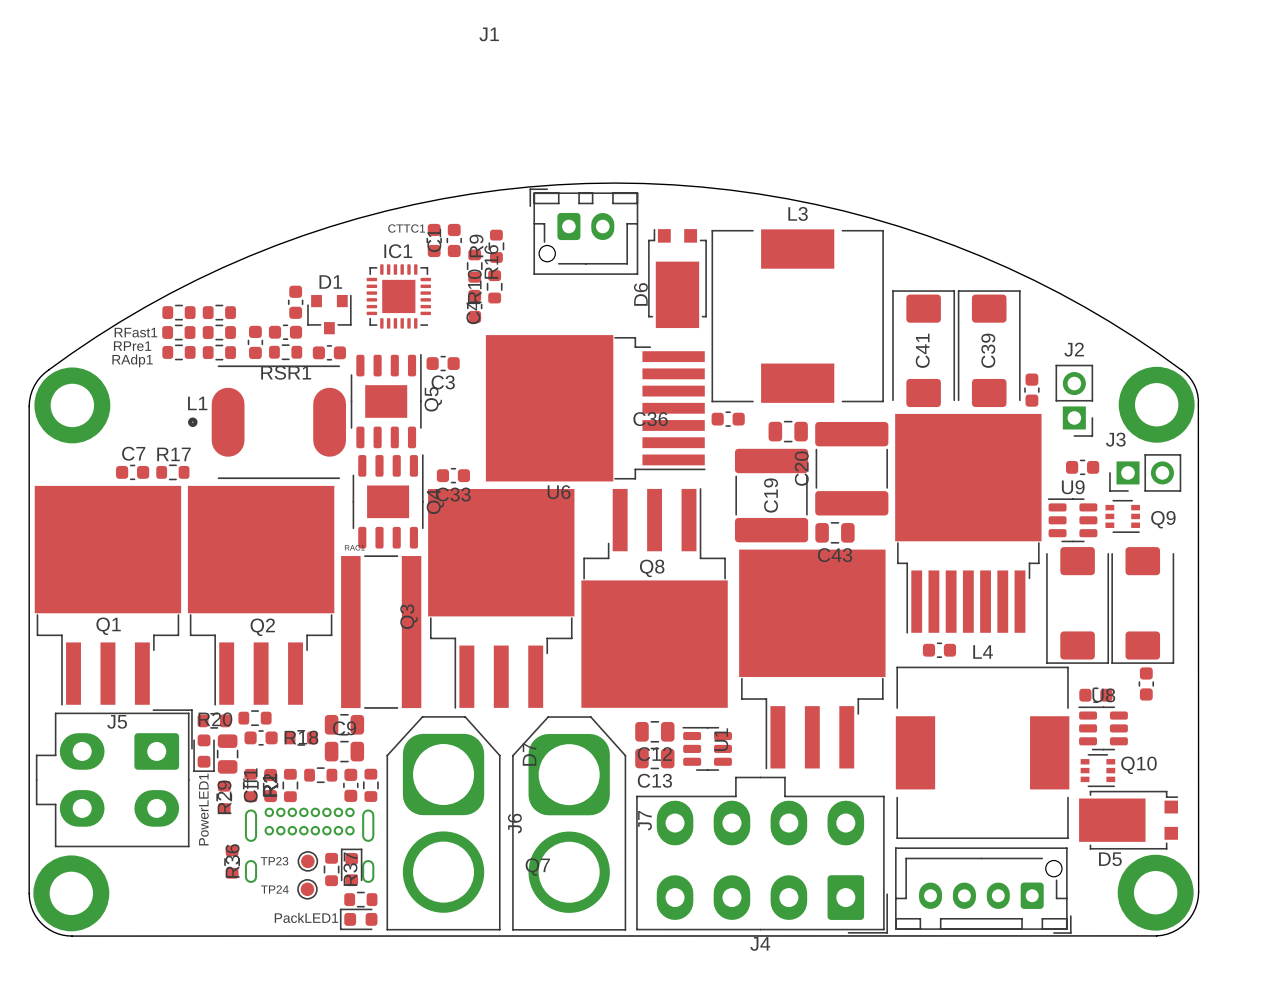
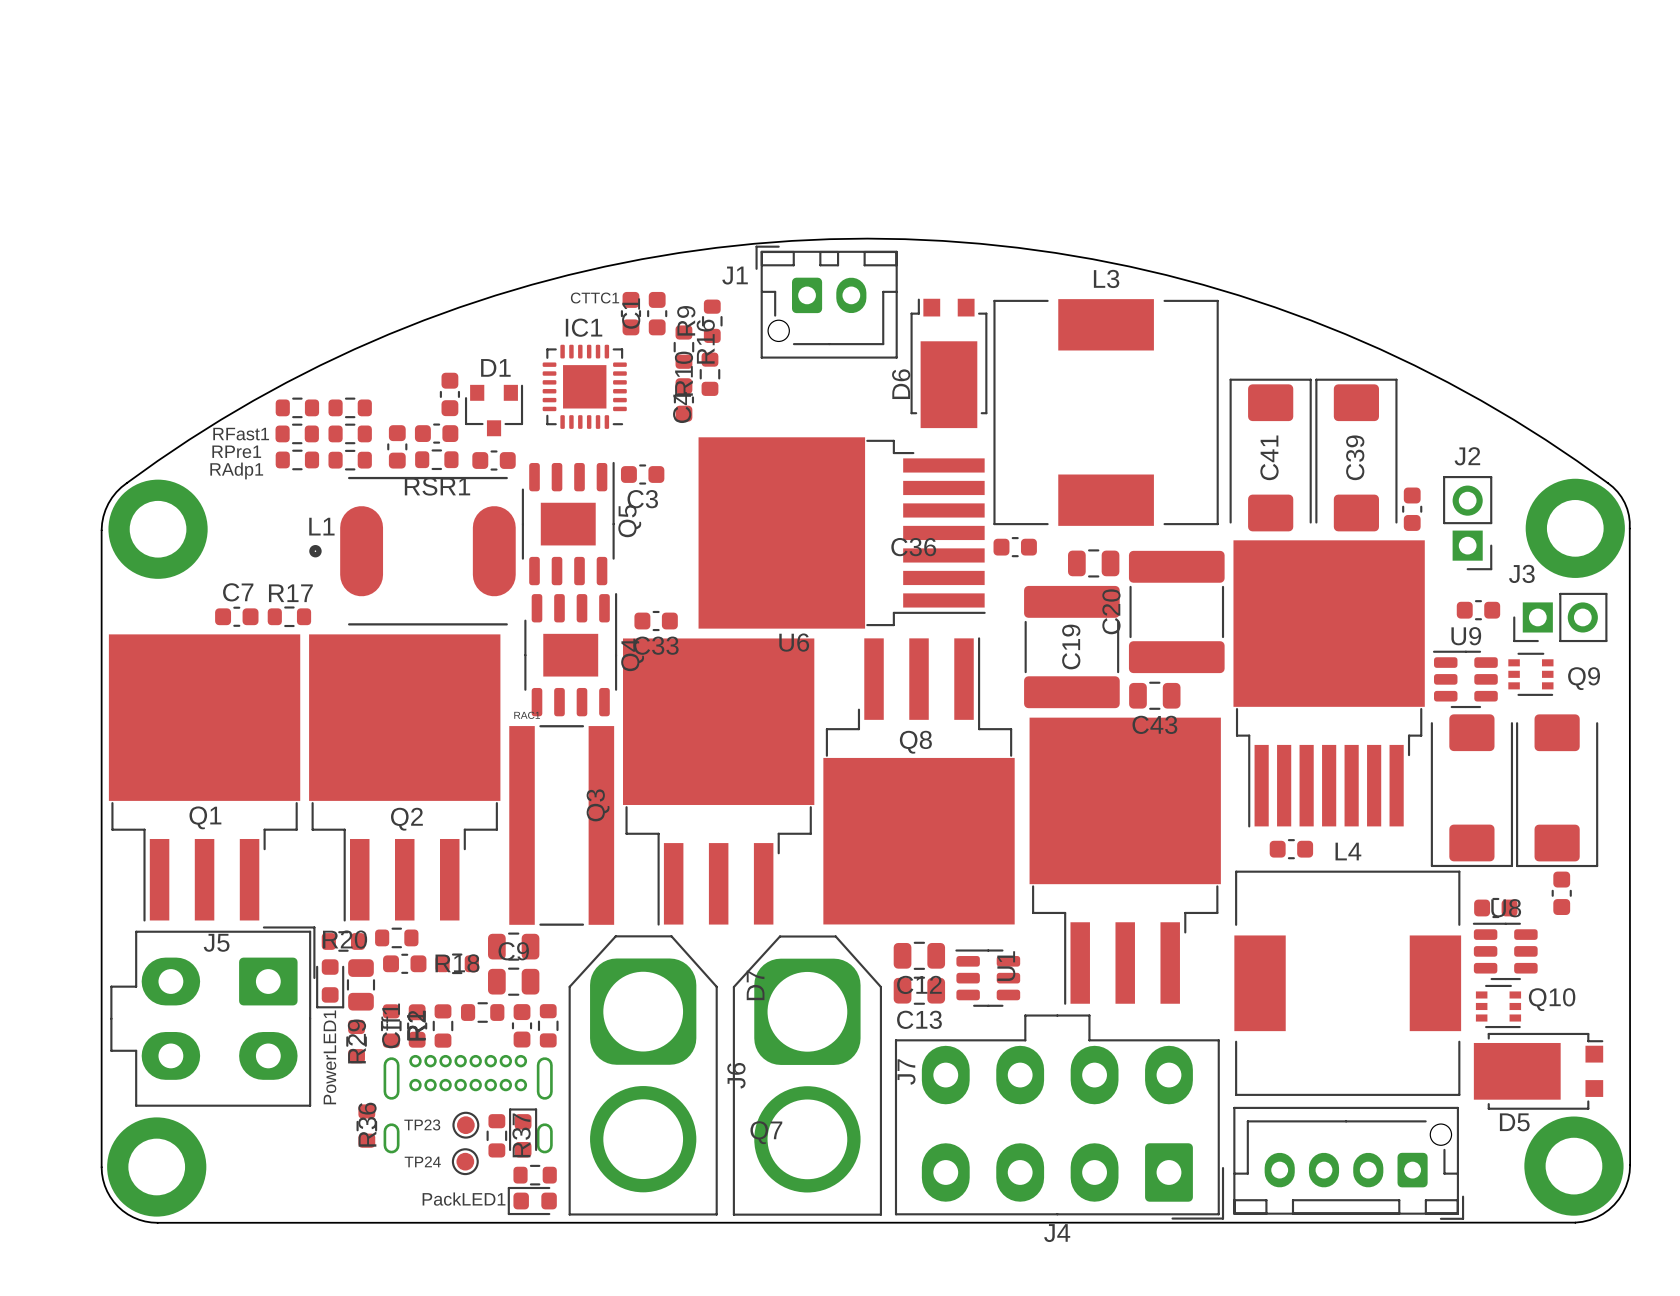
J1 name position: J1 (489, 34) -> J1 (735, 275)

